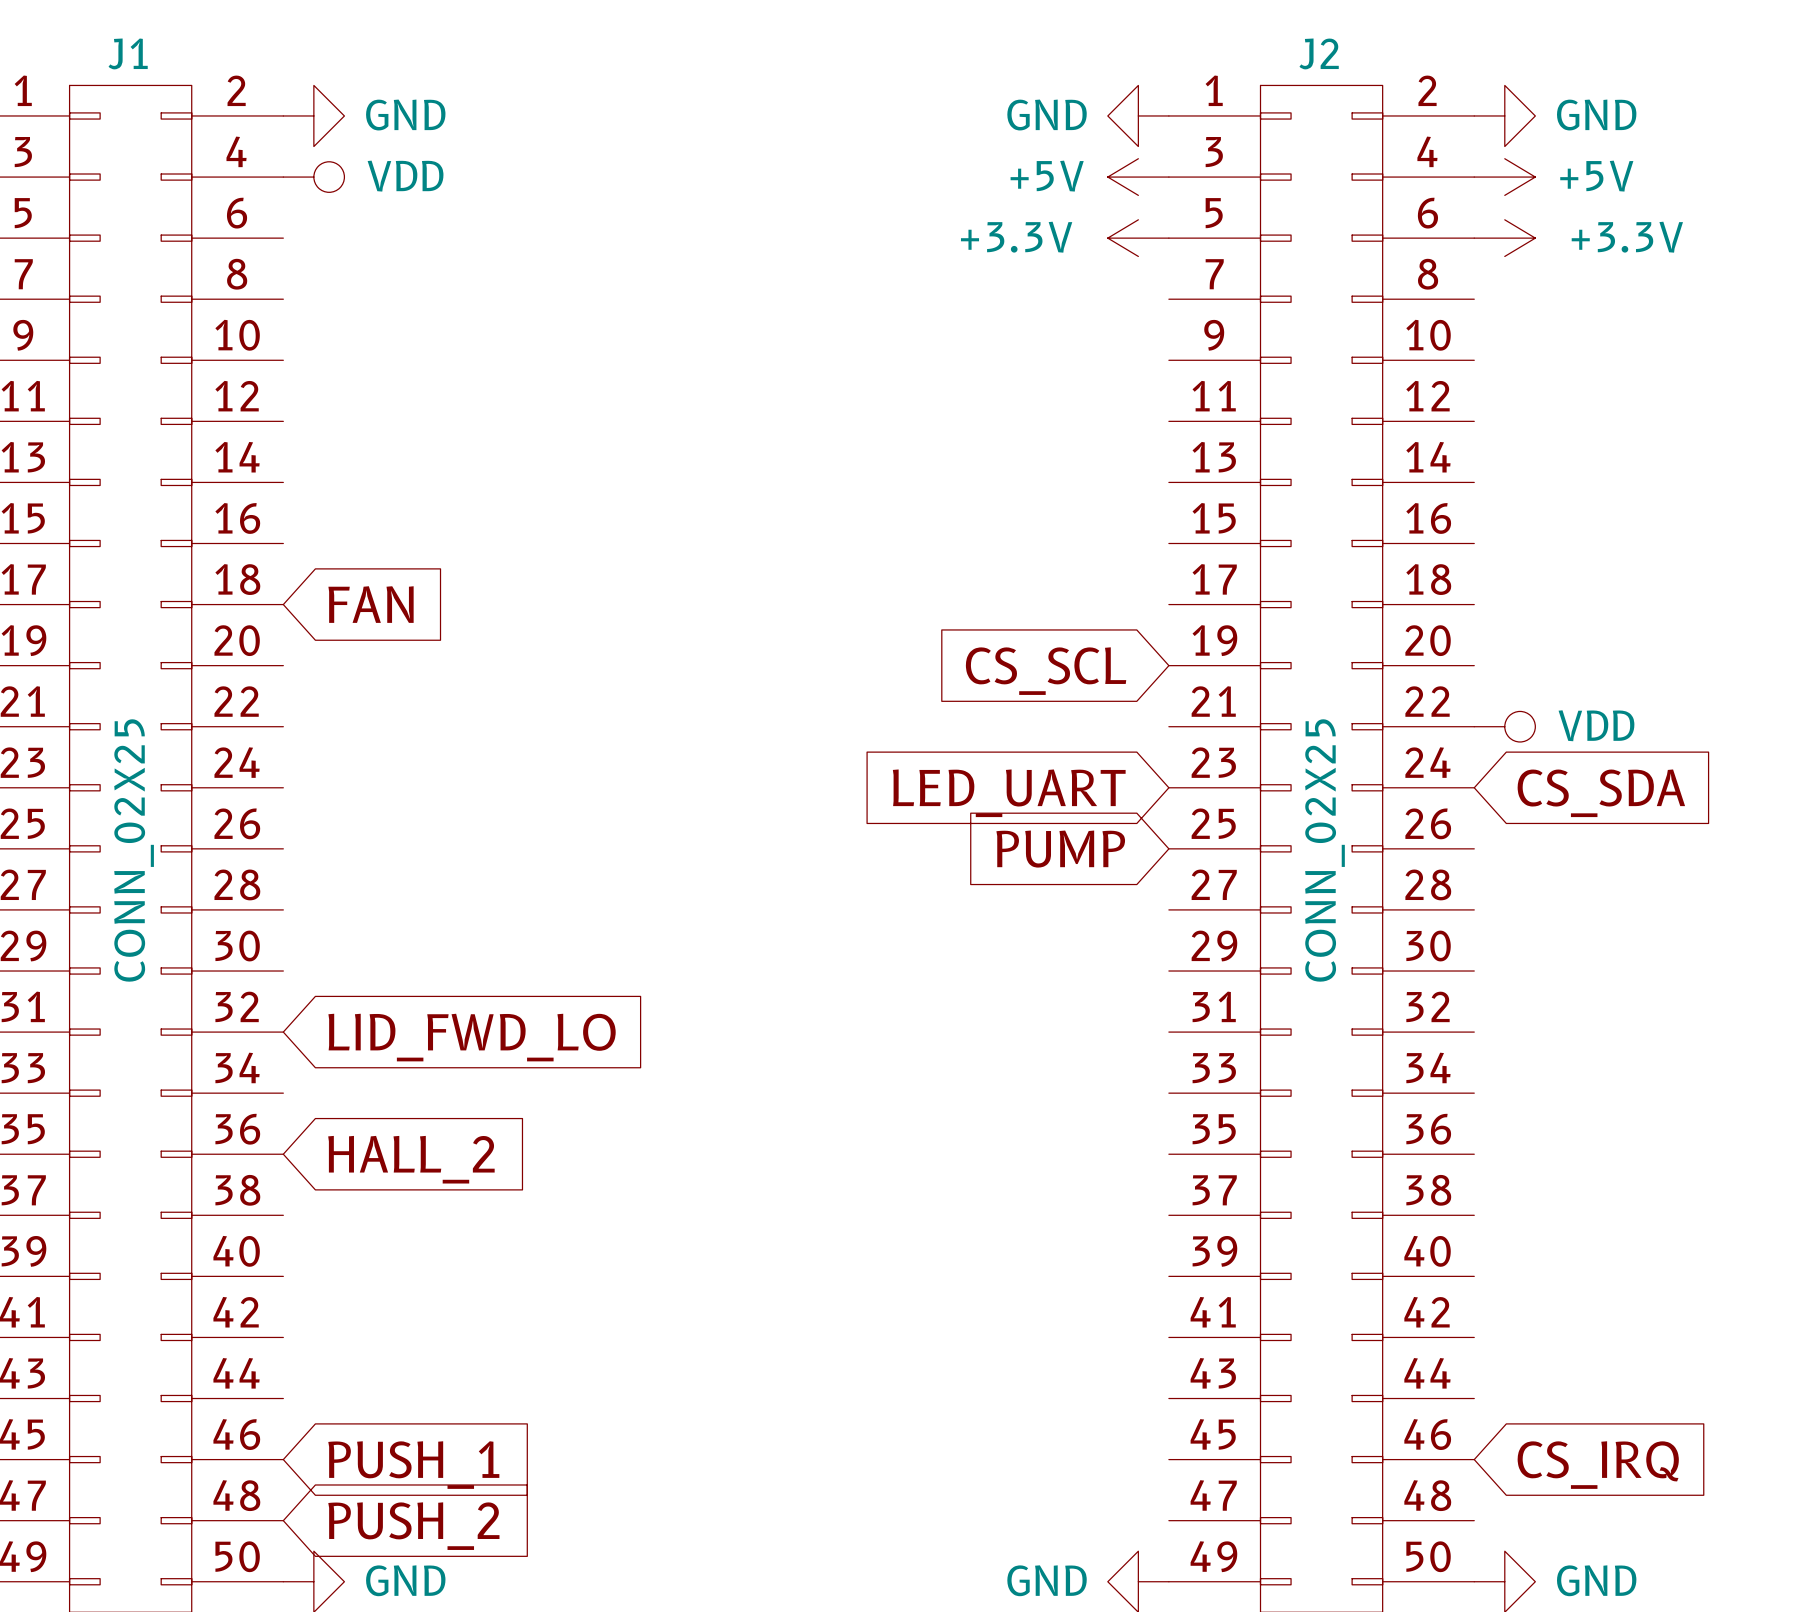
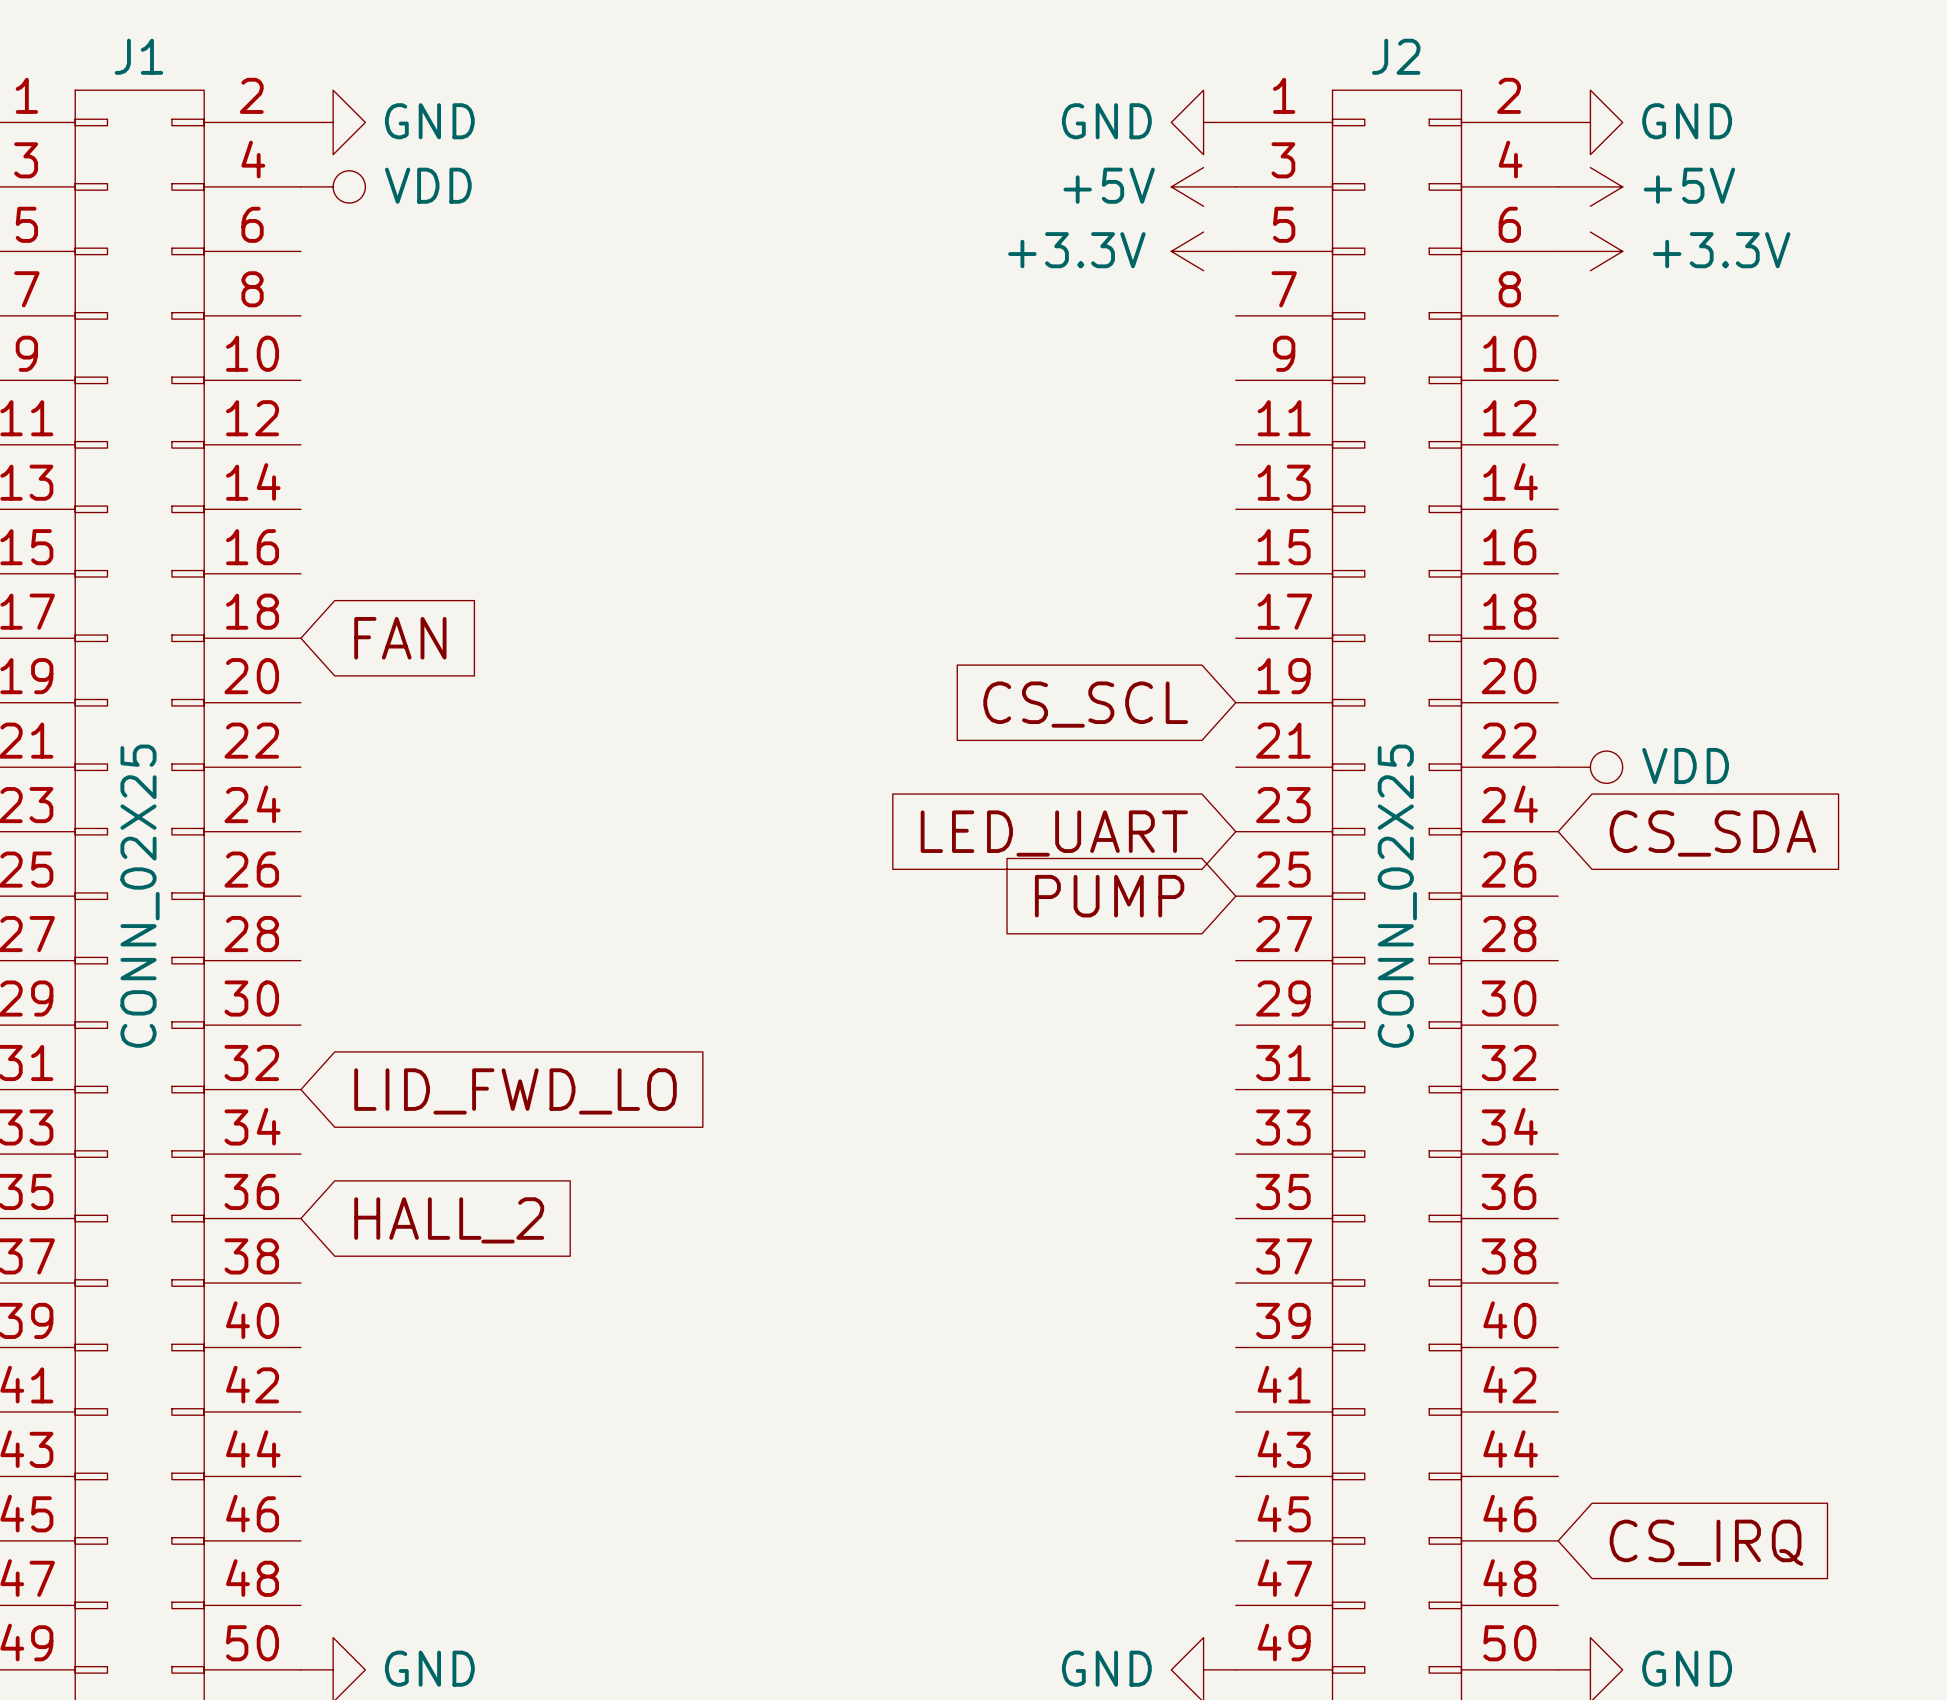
global label: PUSH_1 (413, 1465) -> none
global label: PUSH_2 (413, 1526) -> none

